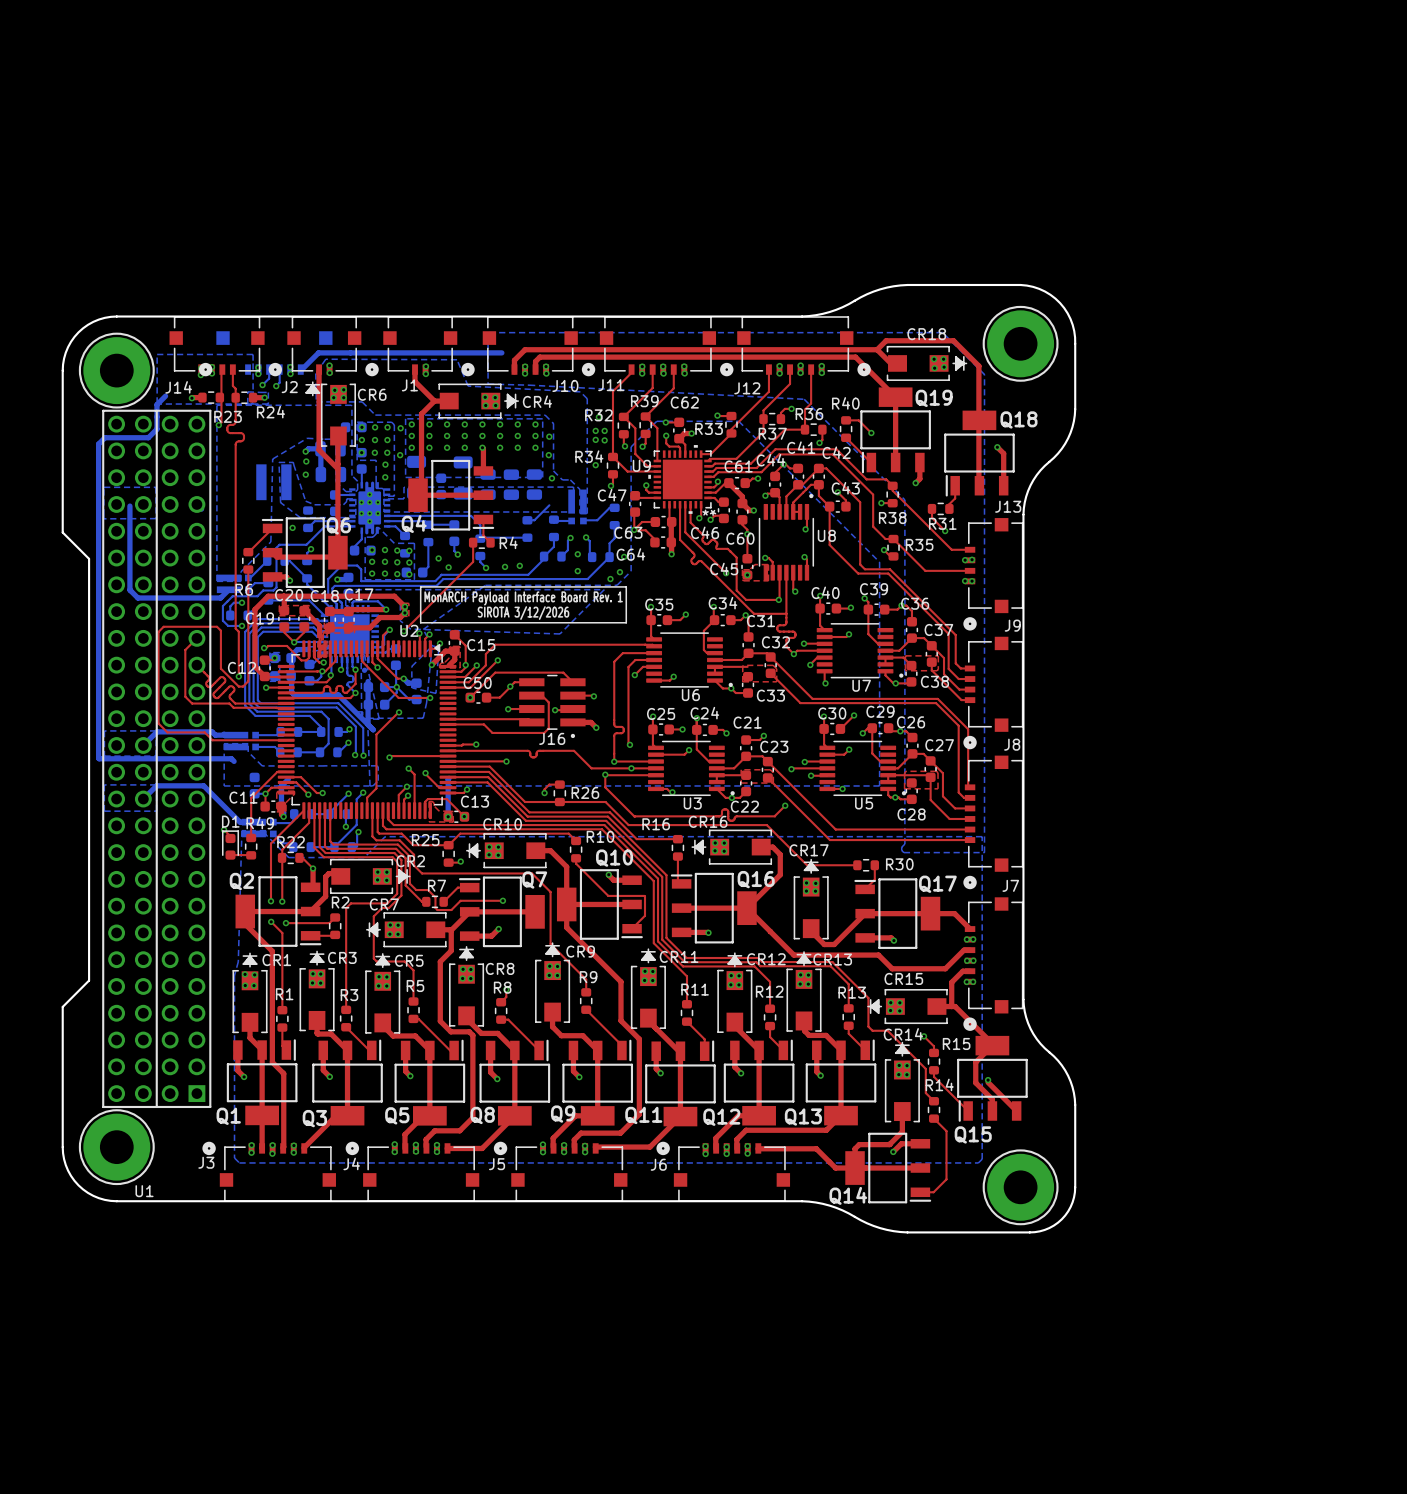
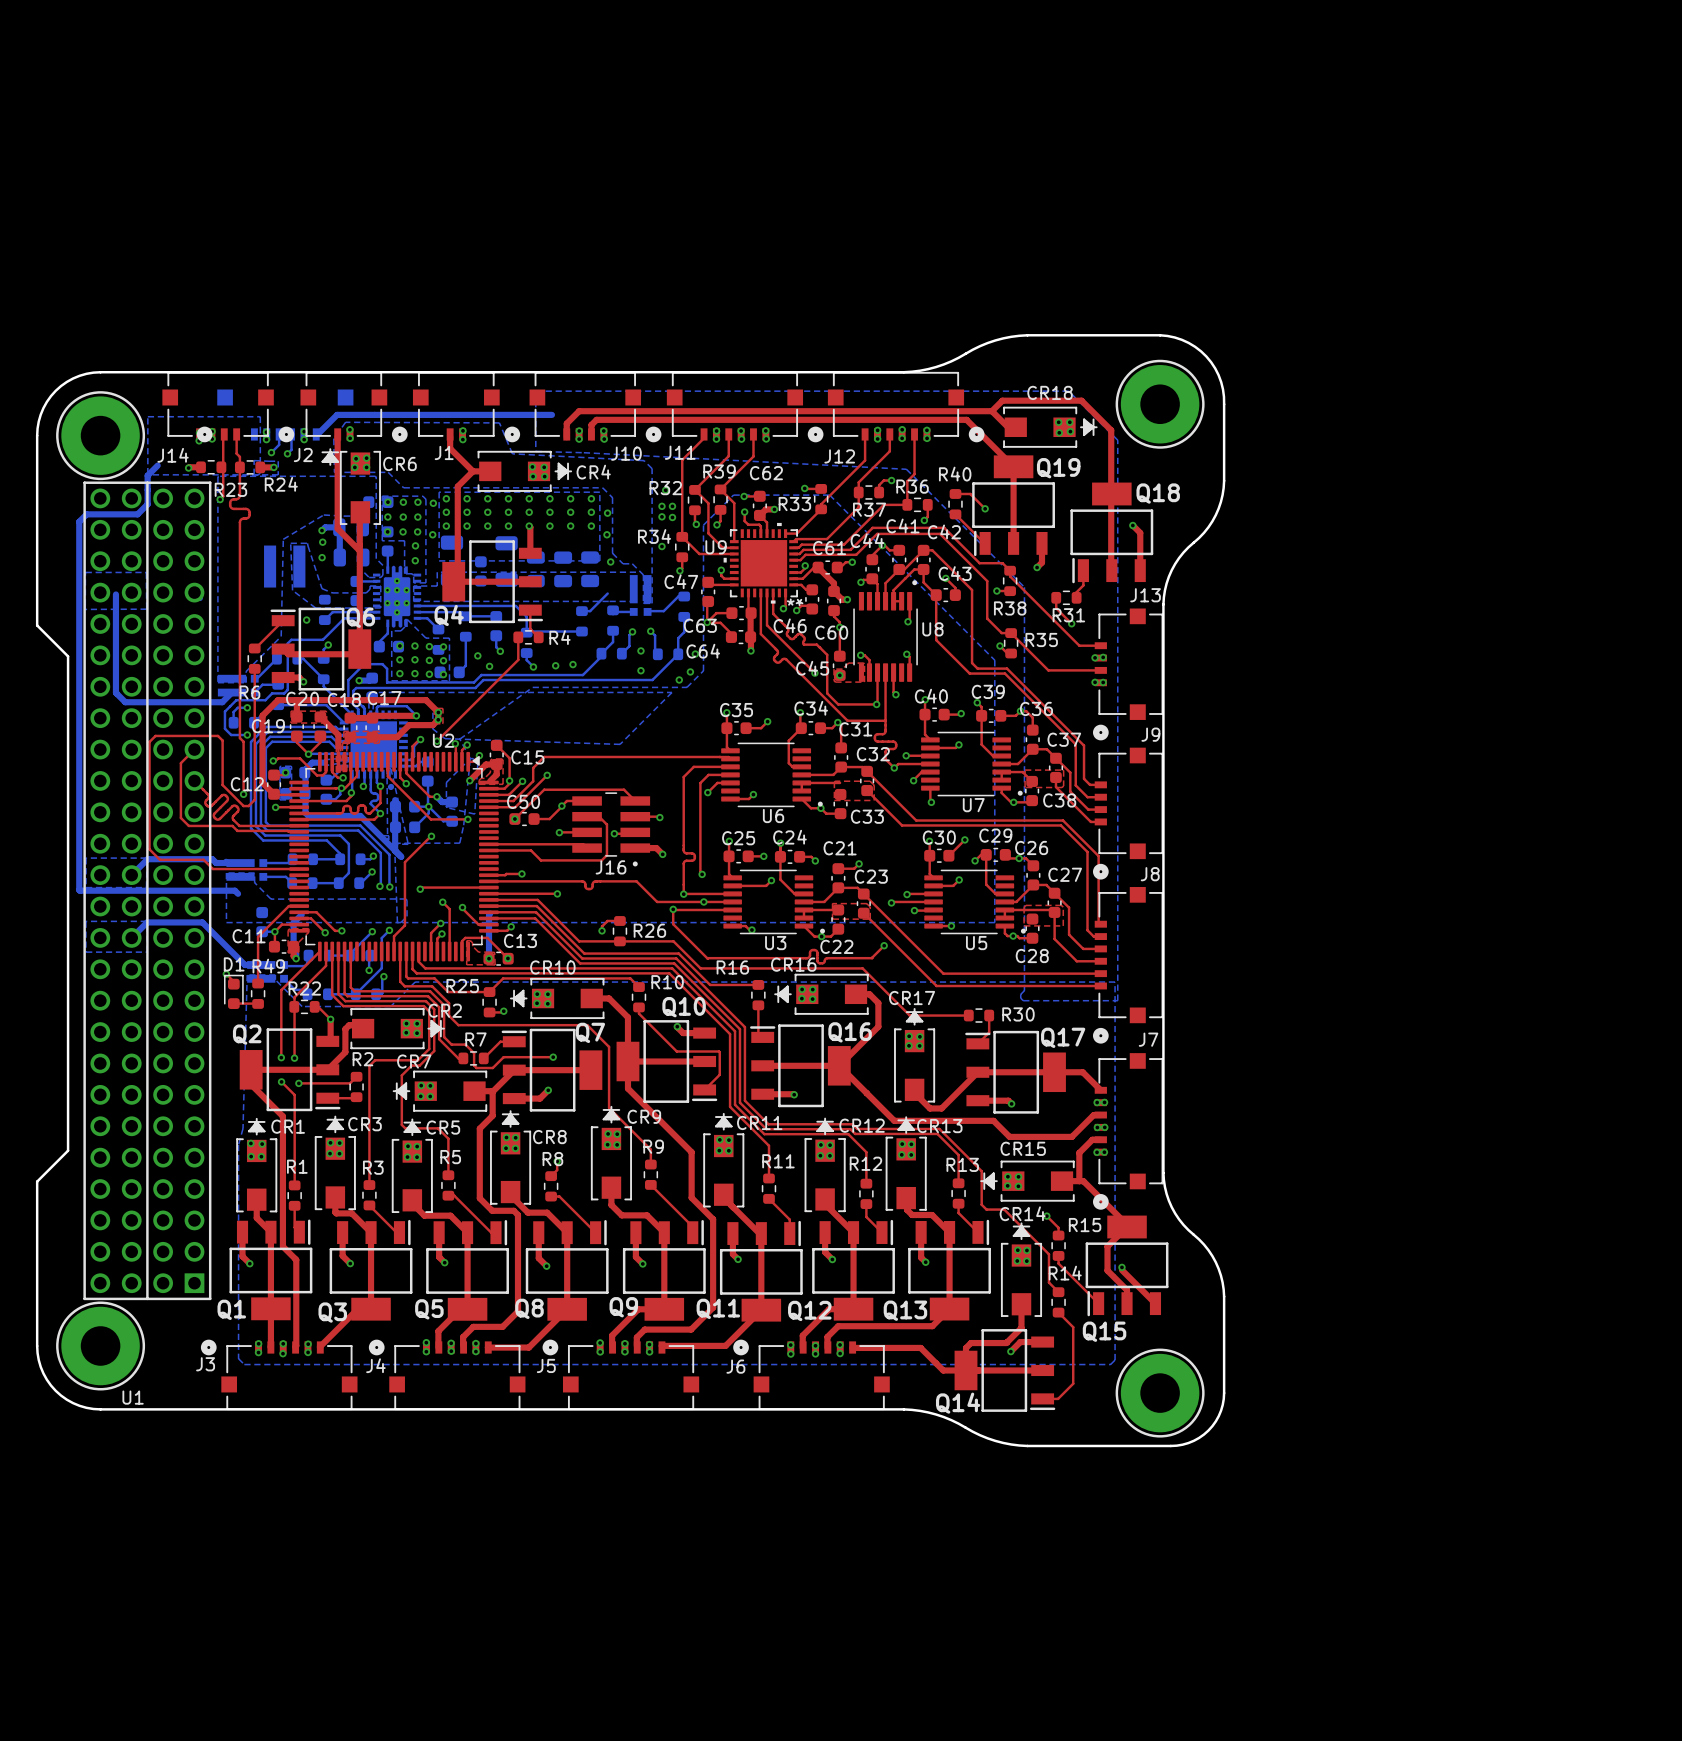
line: (420, 586) (626, 586) (626, 622) (420, 622) (420, 586) -> none
text: MonARCH Payload Interface Board Rev. 1 (523, 598) -> none
text: SIROTA 3/12/2026 (523, 613) -> none

